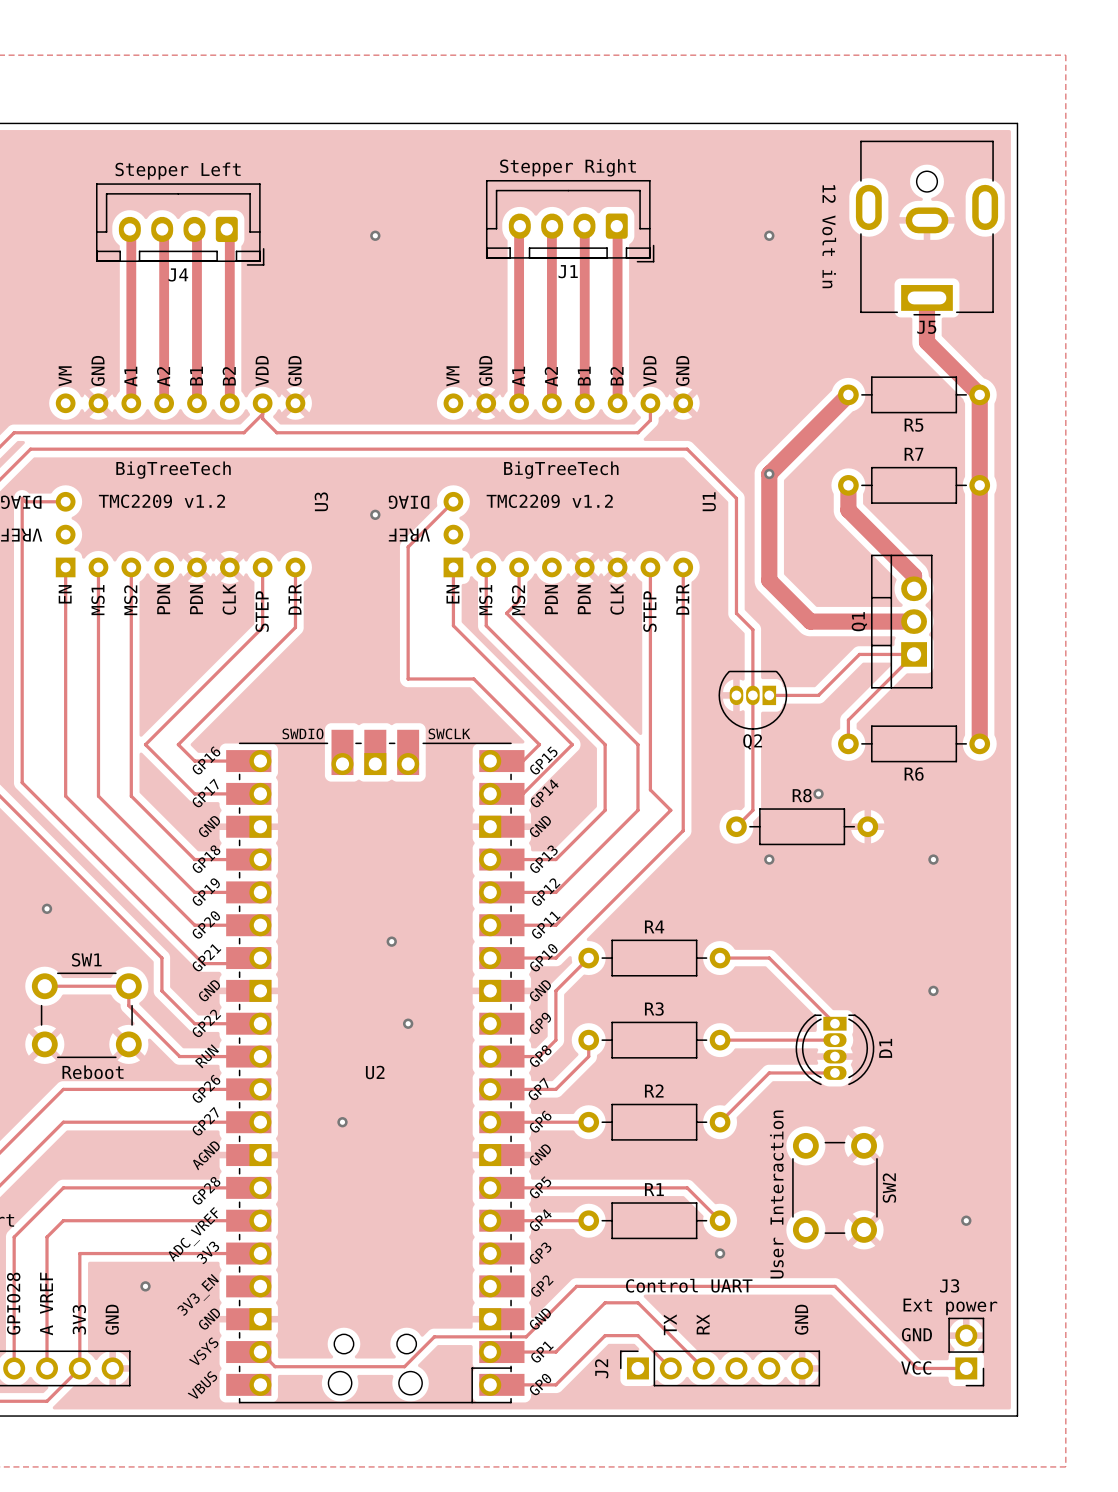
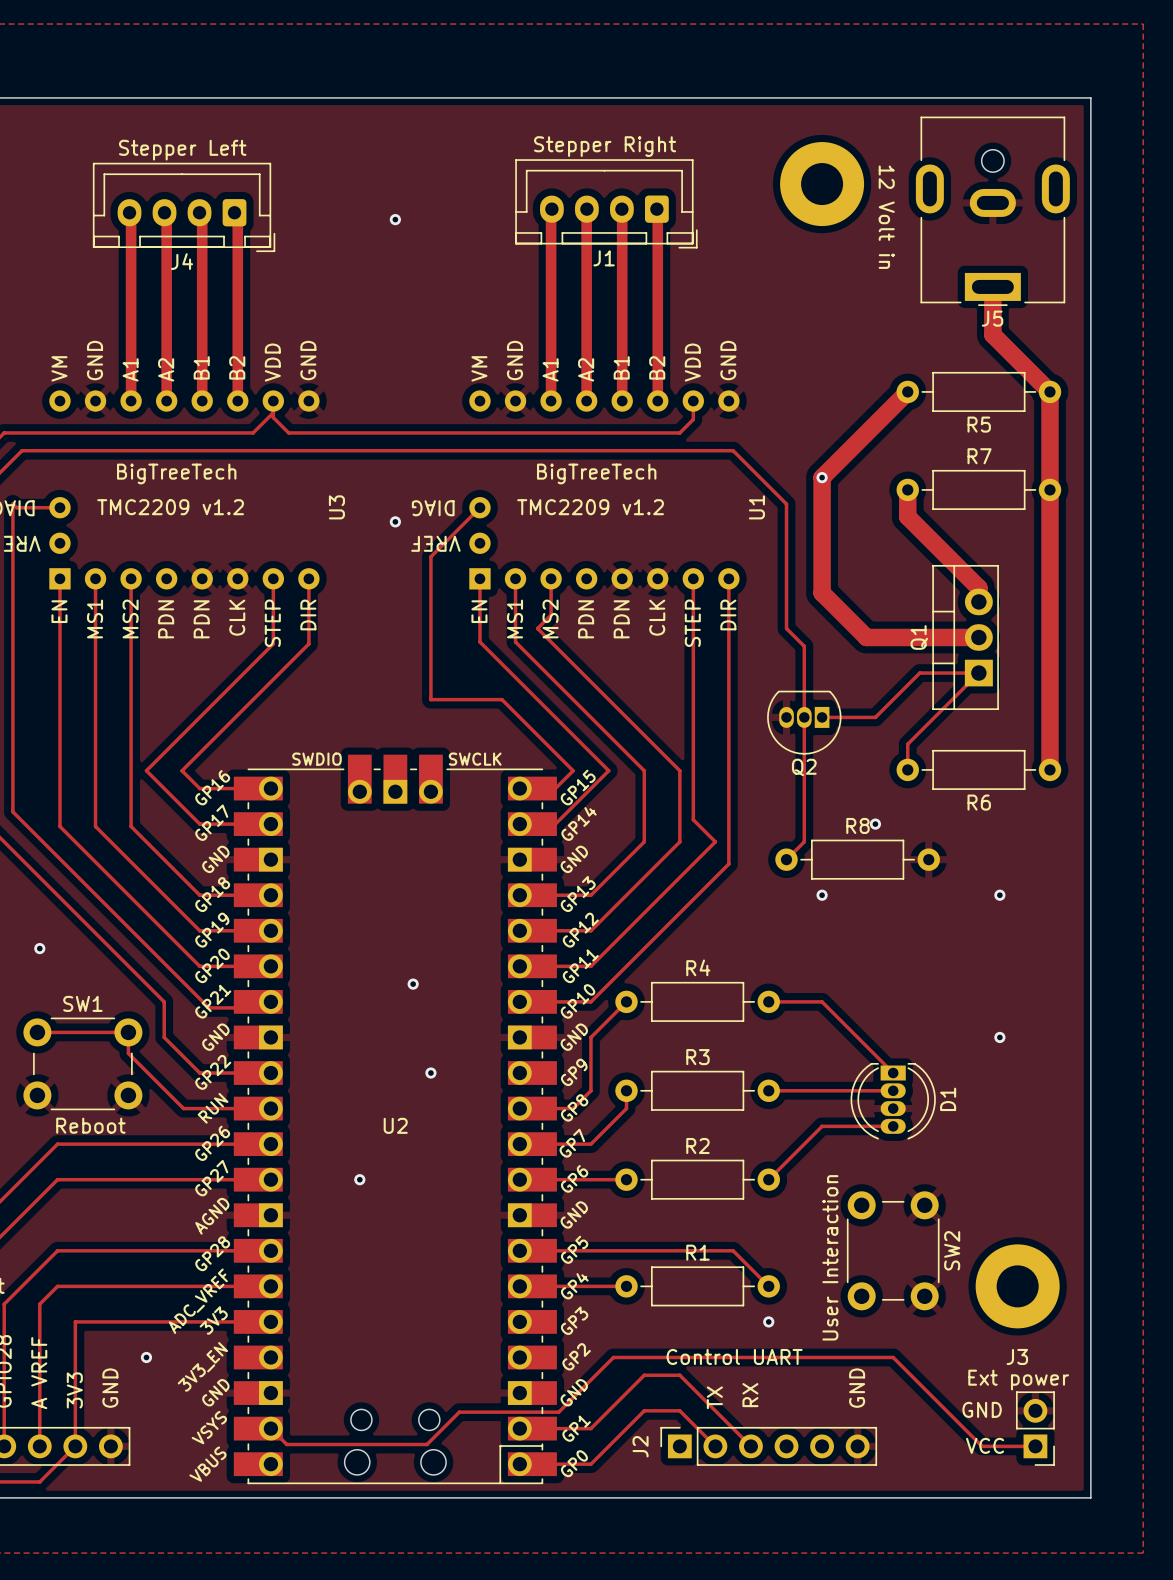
part: none -> (822, 184)
via: (769, 235) -> none
part: none -> (1017, 1286)
via: (966, 1220) -> none

